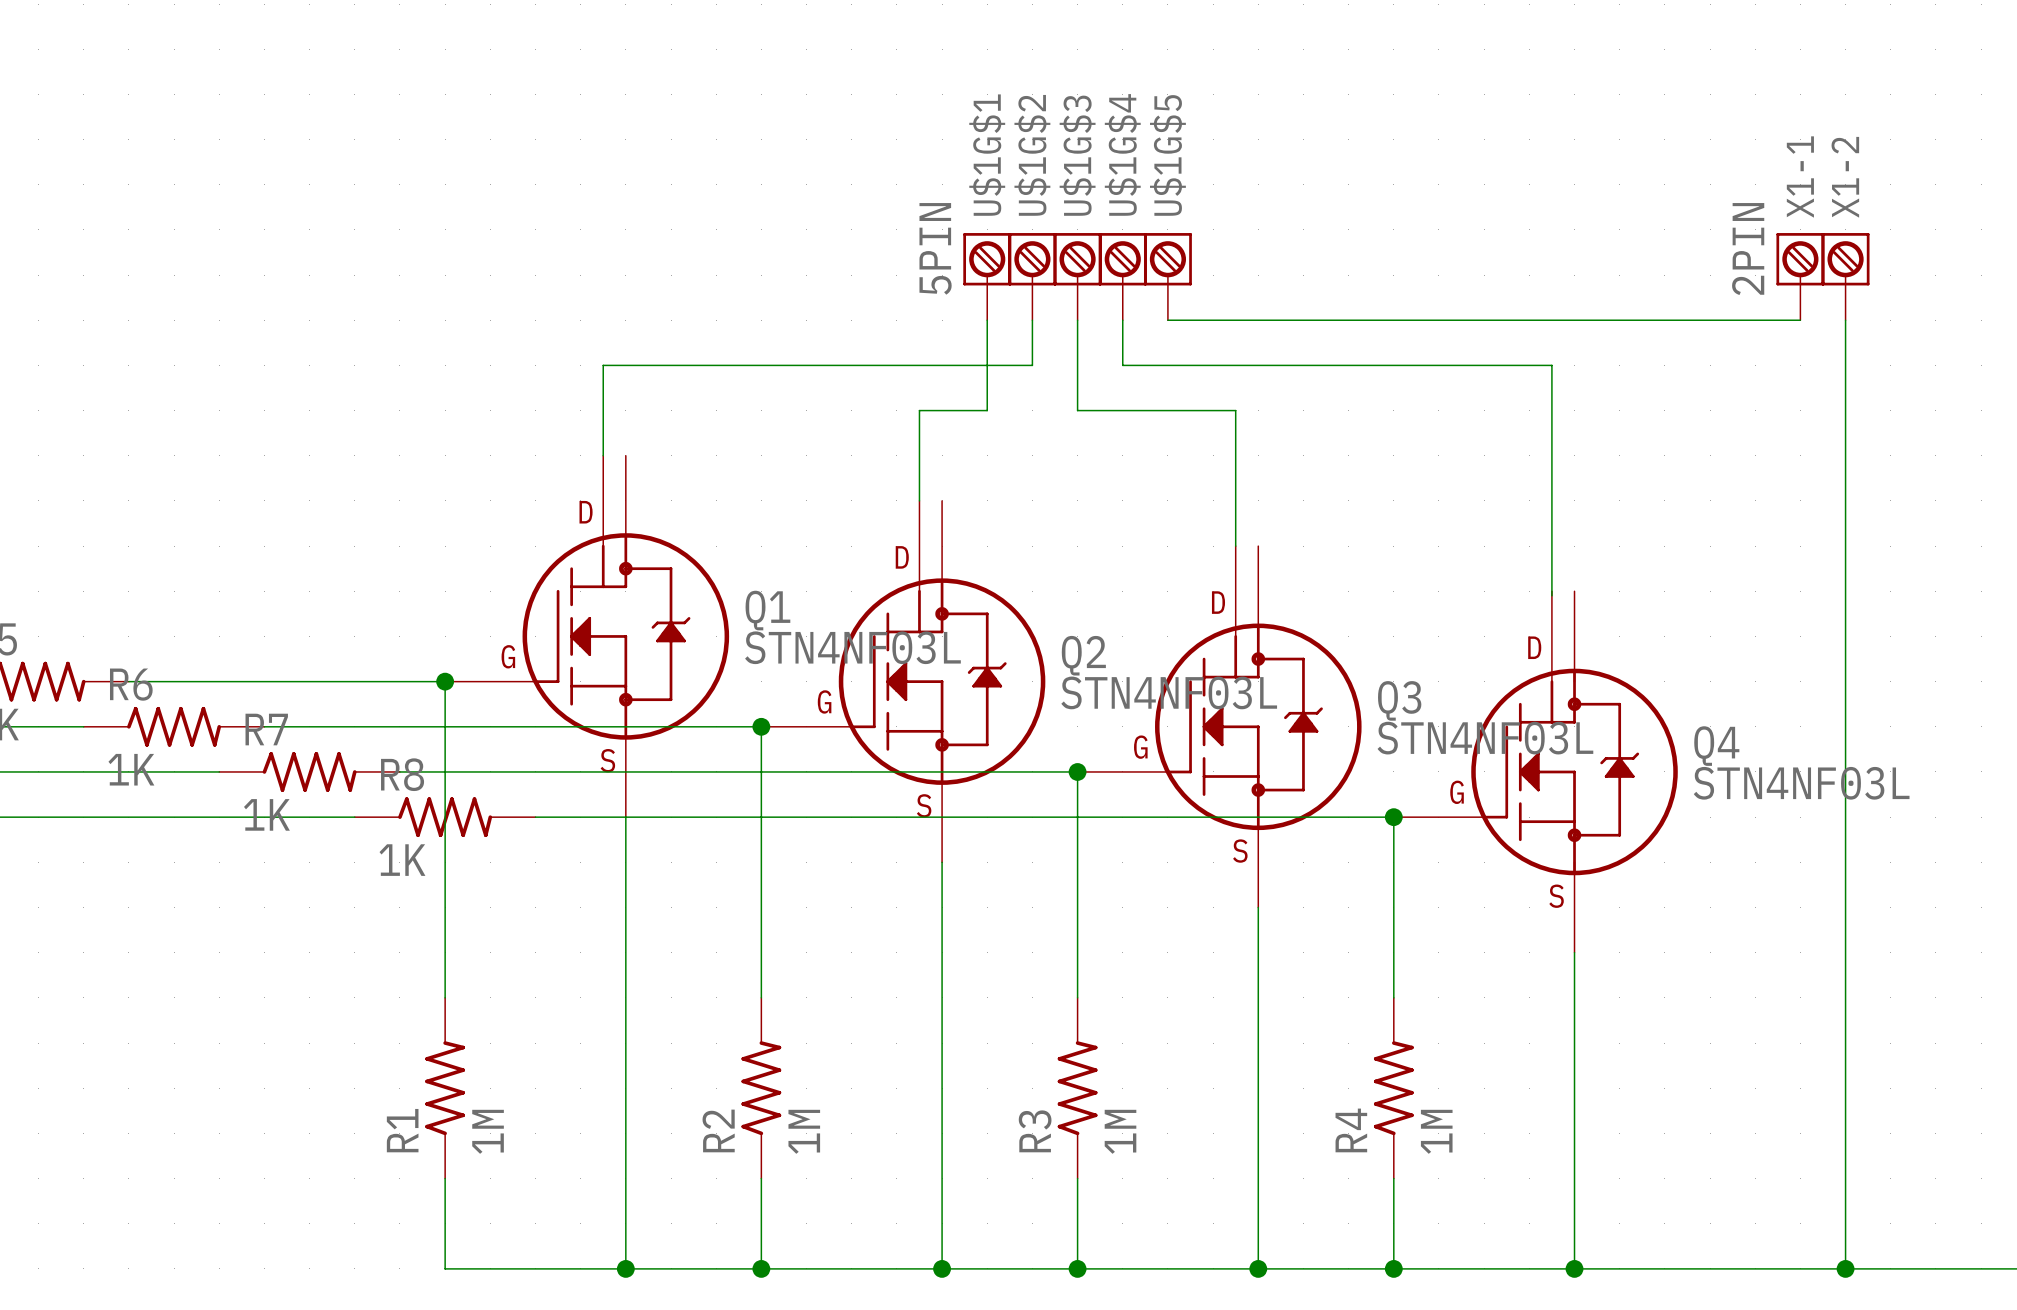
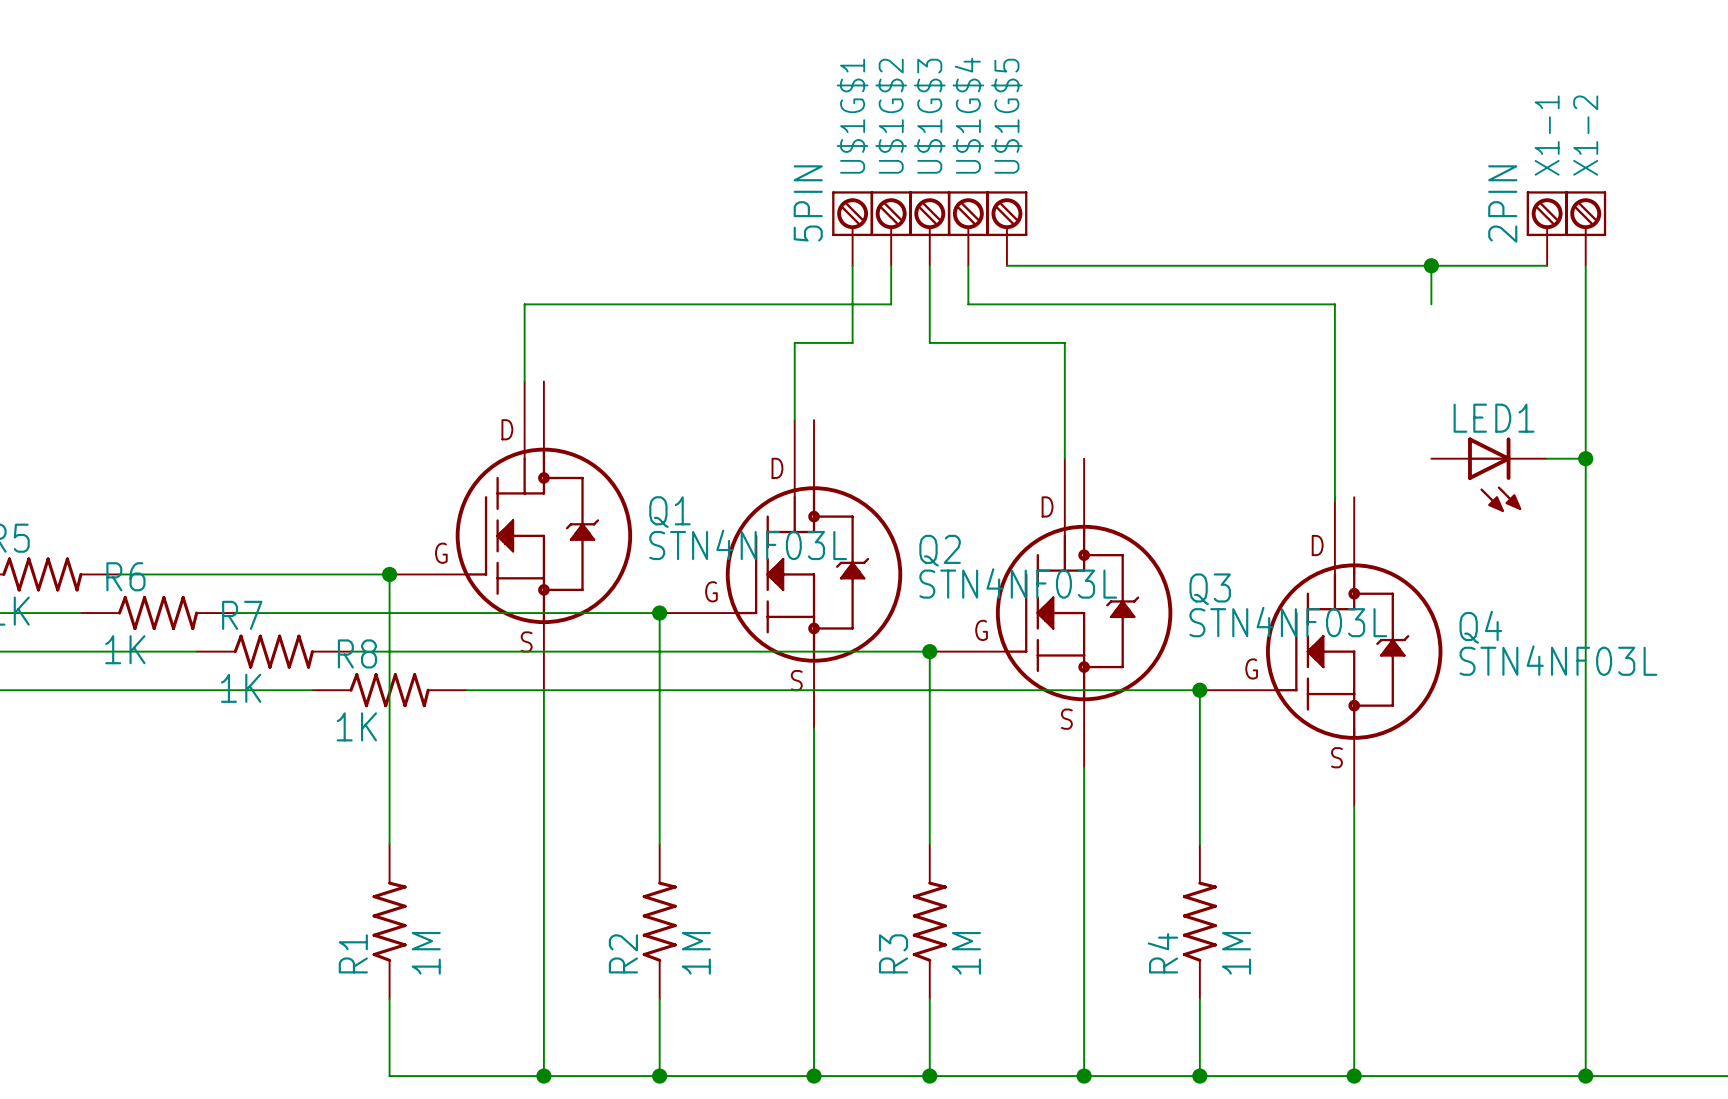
wire: none -> (1431, 265) (1431, 304)
junction: none -> (1431, 265)
wire: none -> (1547, 458) (1585, 458)
junction: none -> (1585, 458)
LED1: none -> (1489, 474)

